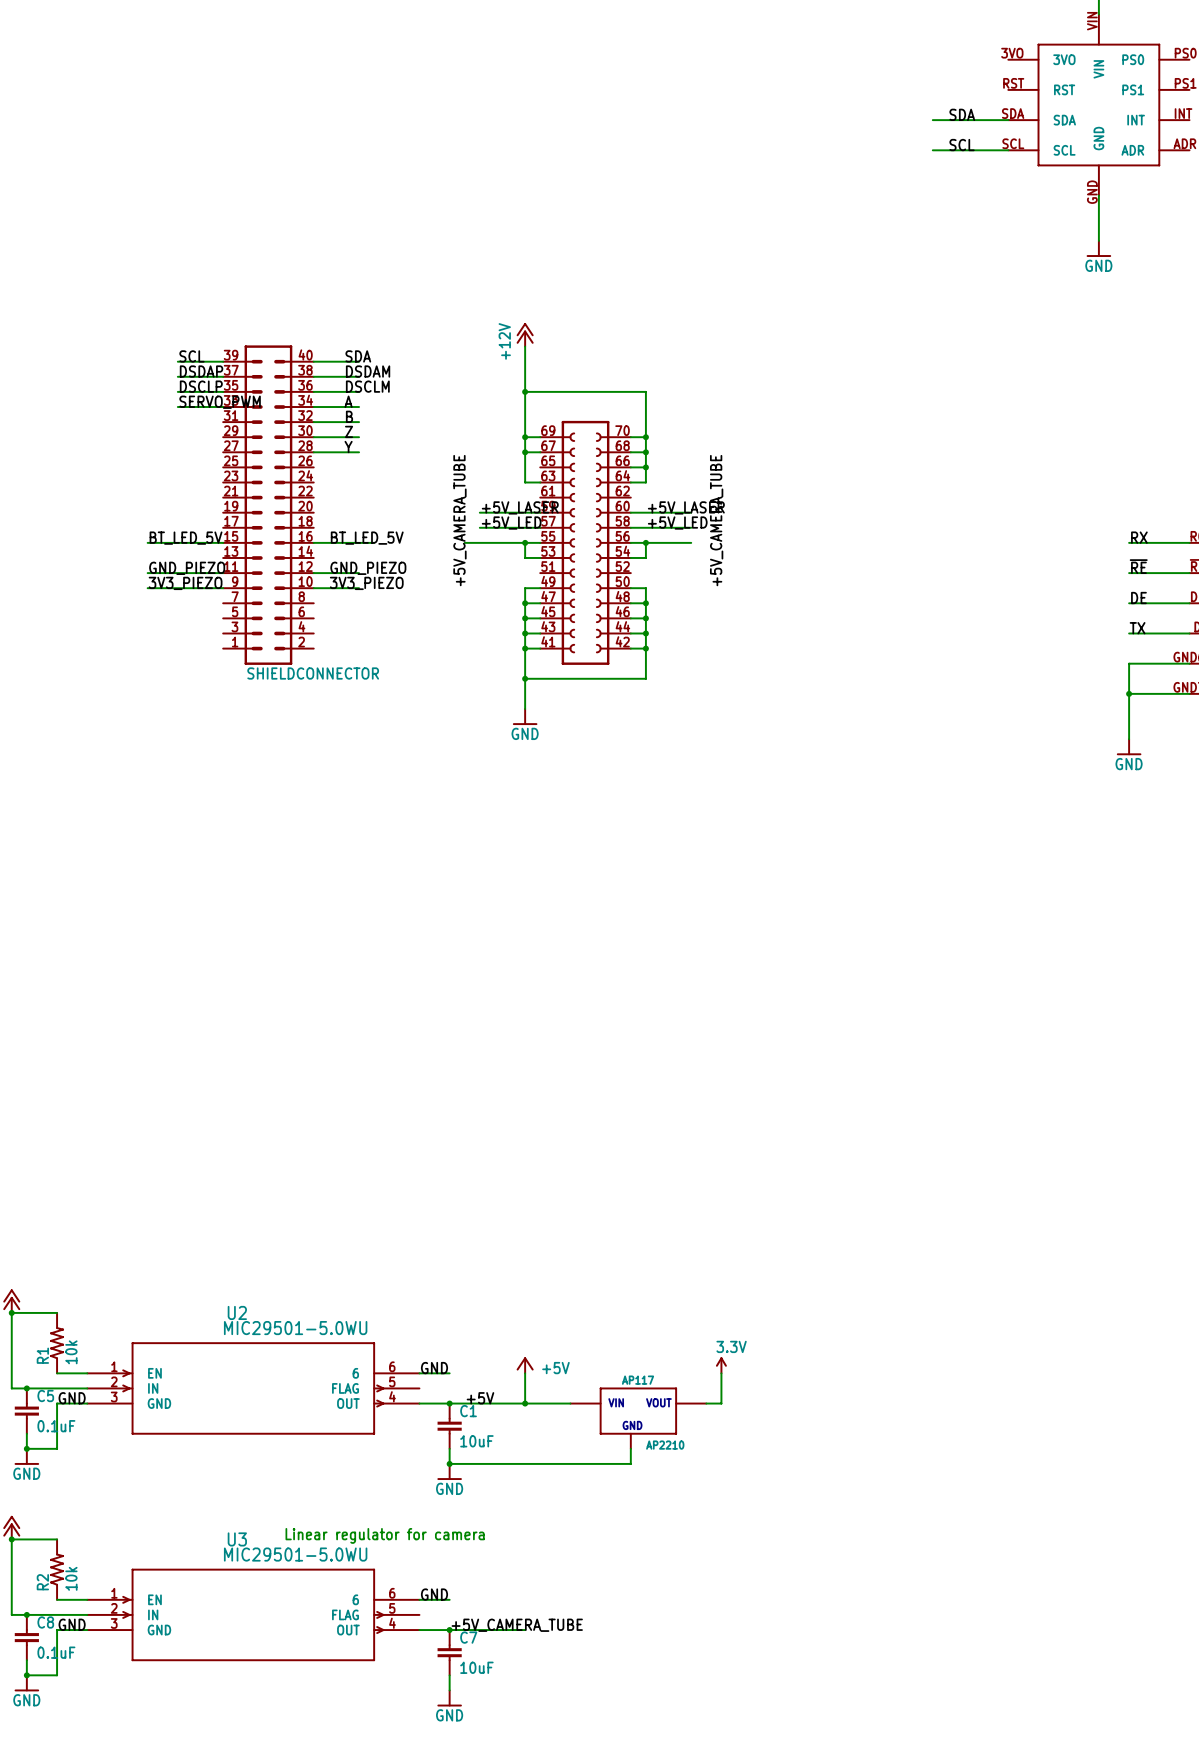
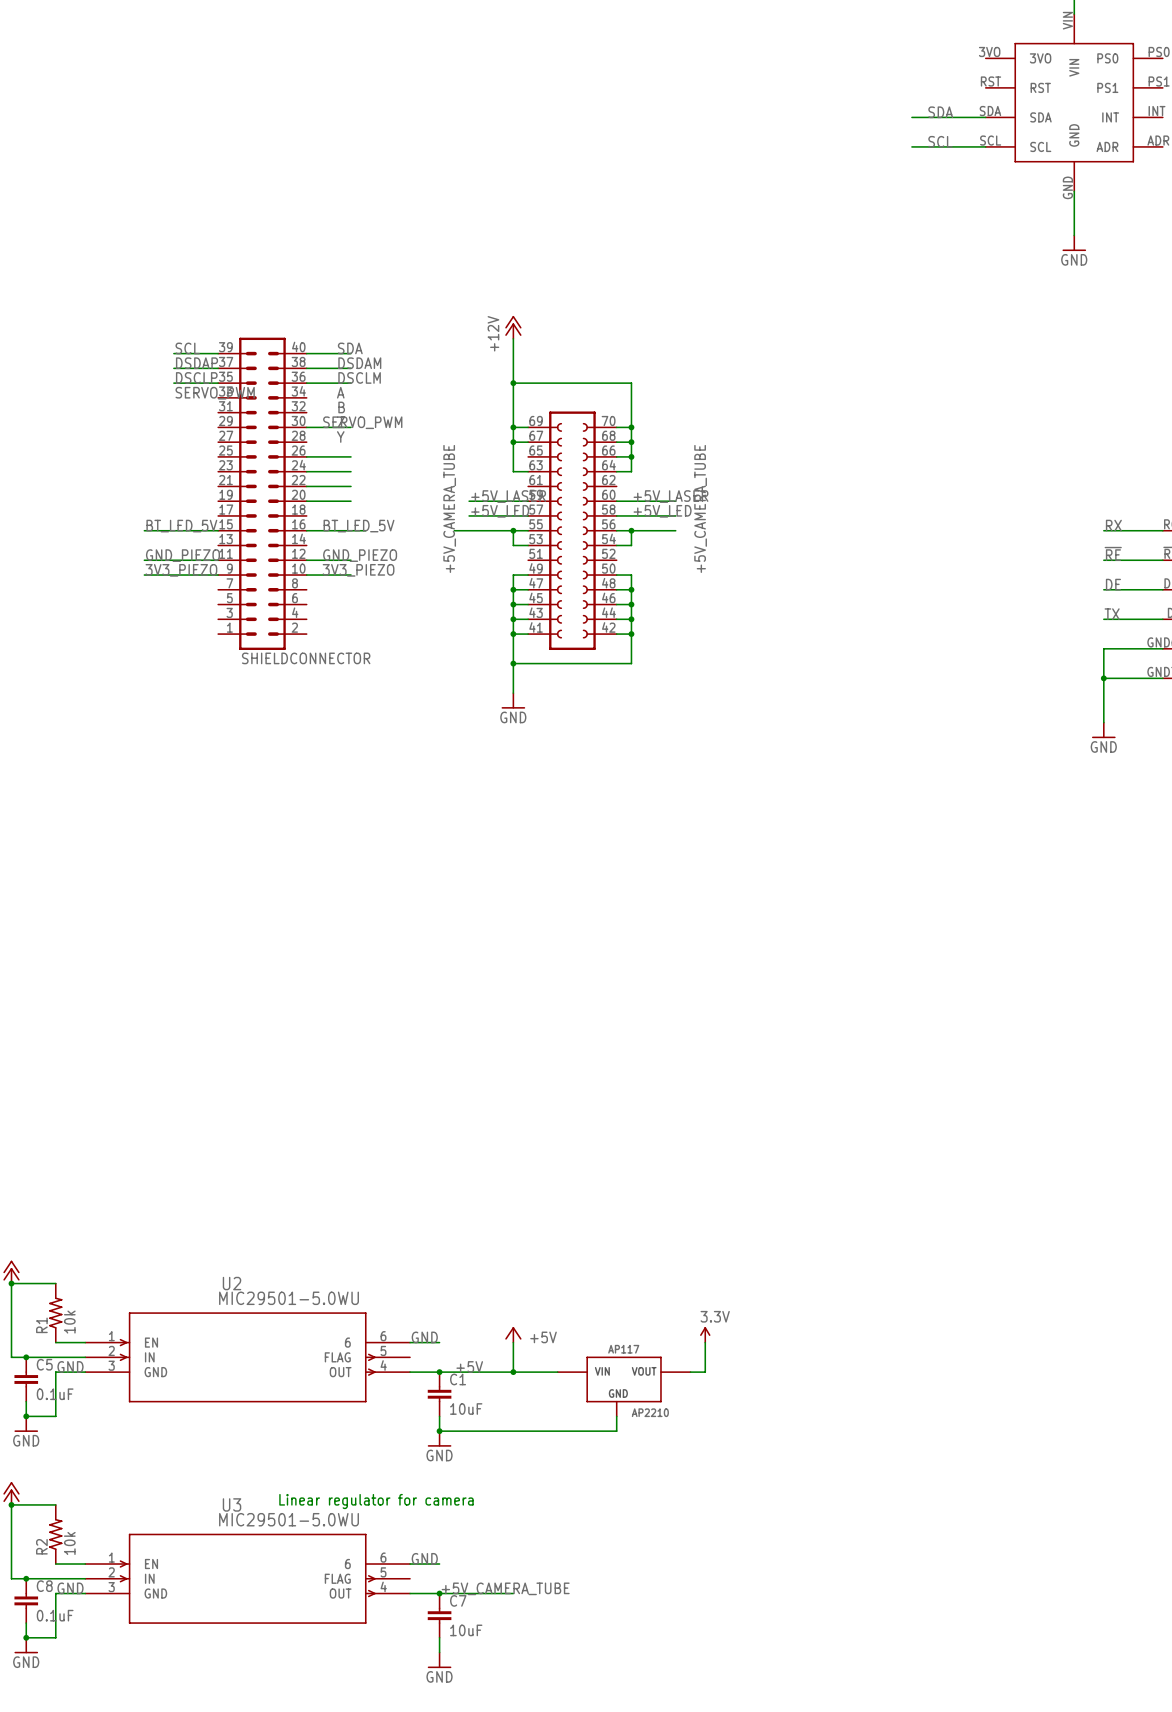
wire: (177, 407) (223, 407) -> none
wire: (313, 407) (359, 407) -> (306, 456) (351, 456)
wire: (313, 422) (359, 422) -> (306, 471) (351, 471)
label: none -> SERVO_PWM (362, 422)
wire: (313, 452) (359, 452) -> (306, 501) (351, 501)
wire: none -> (306, 486) (351, 486)

